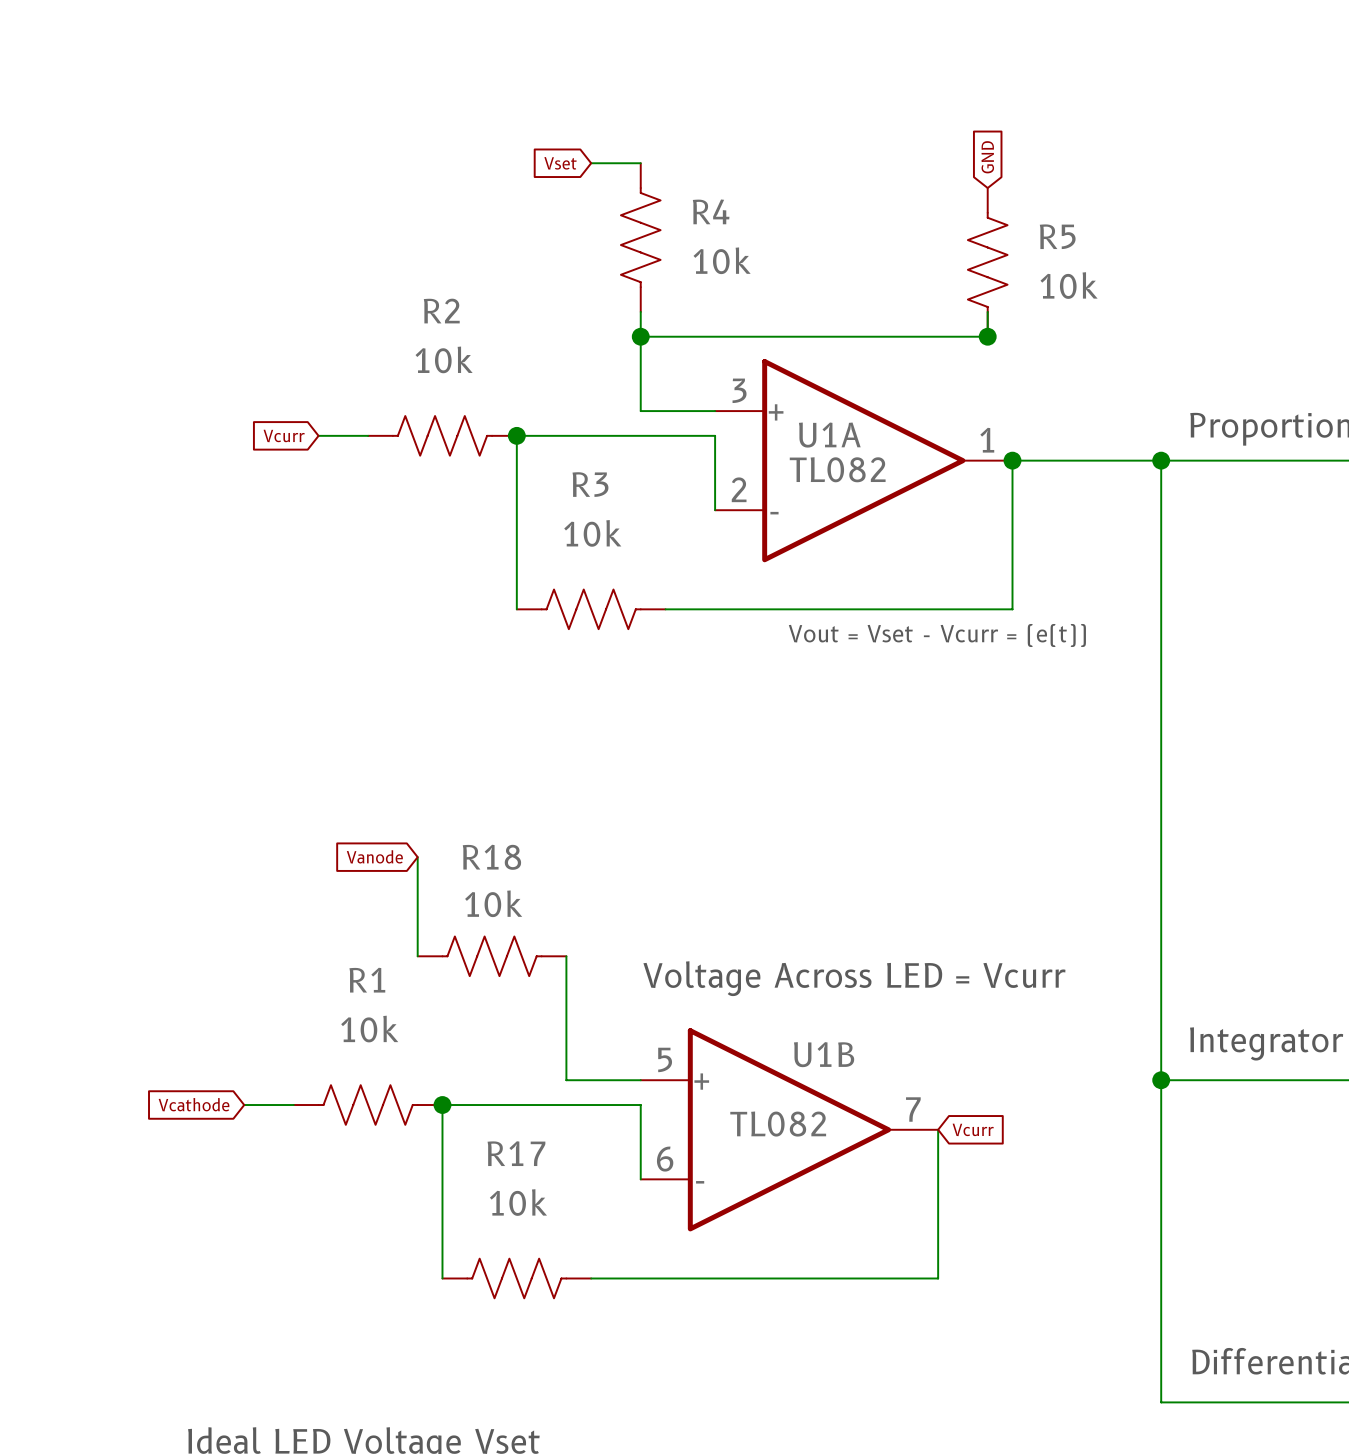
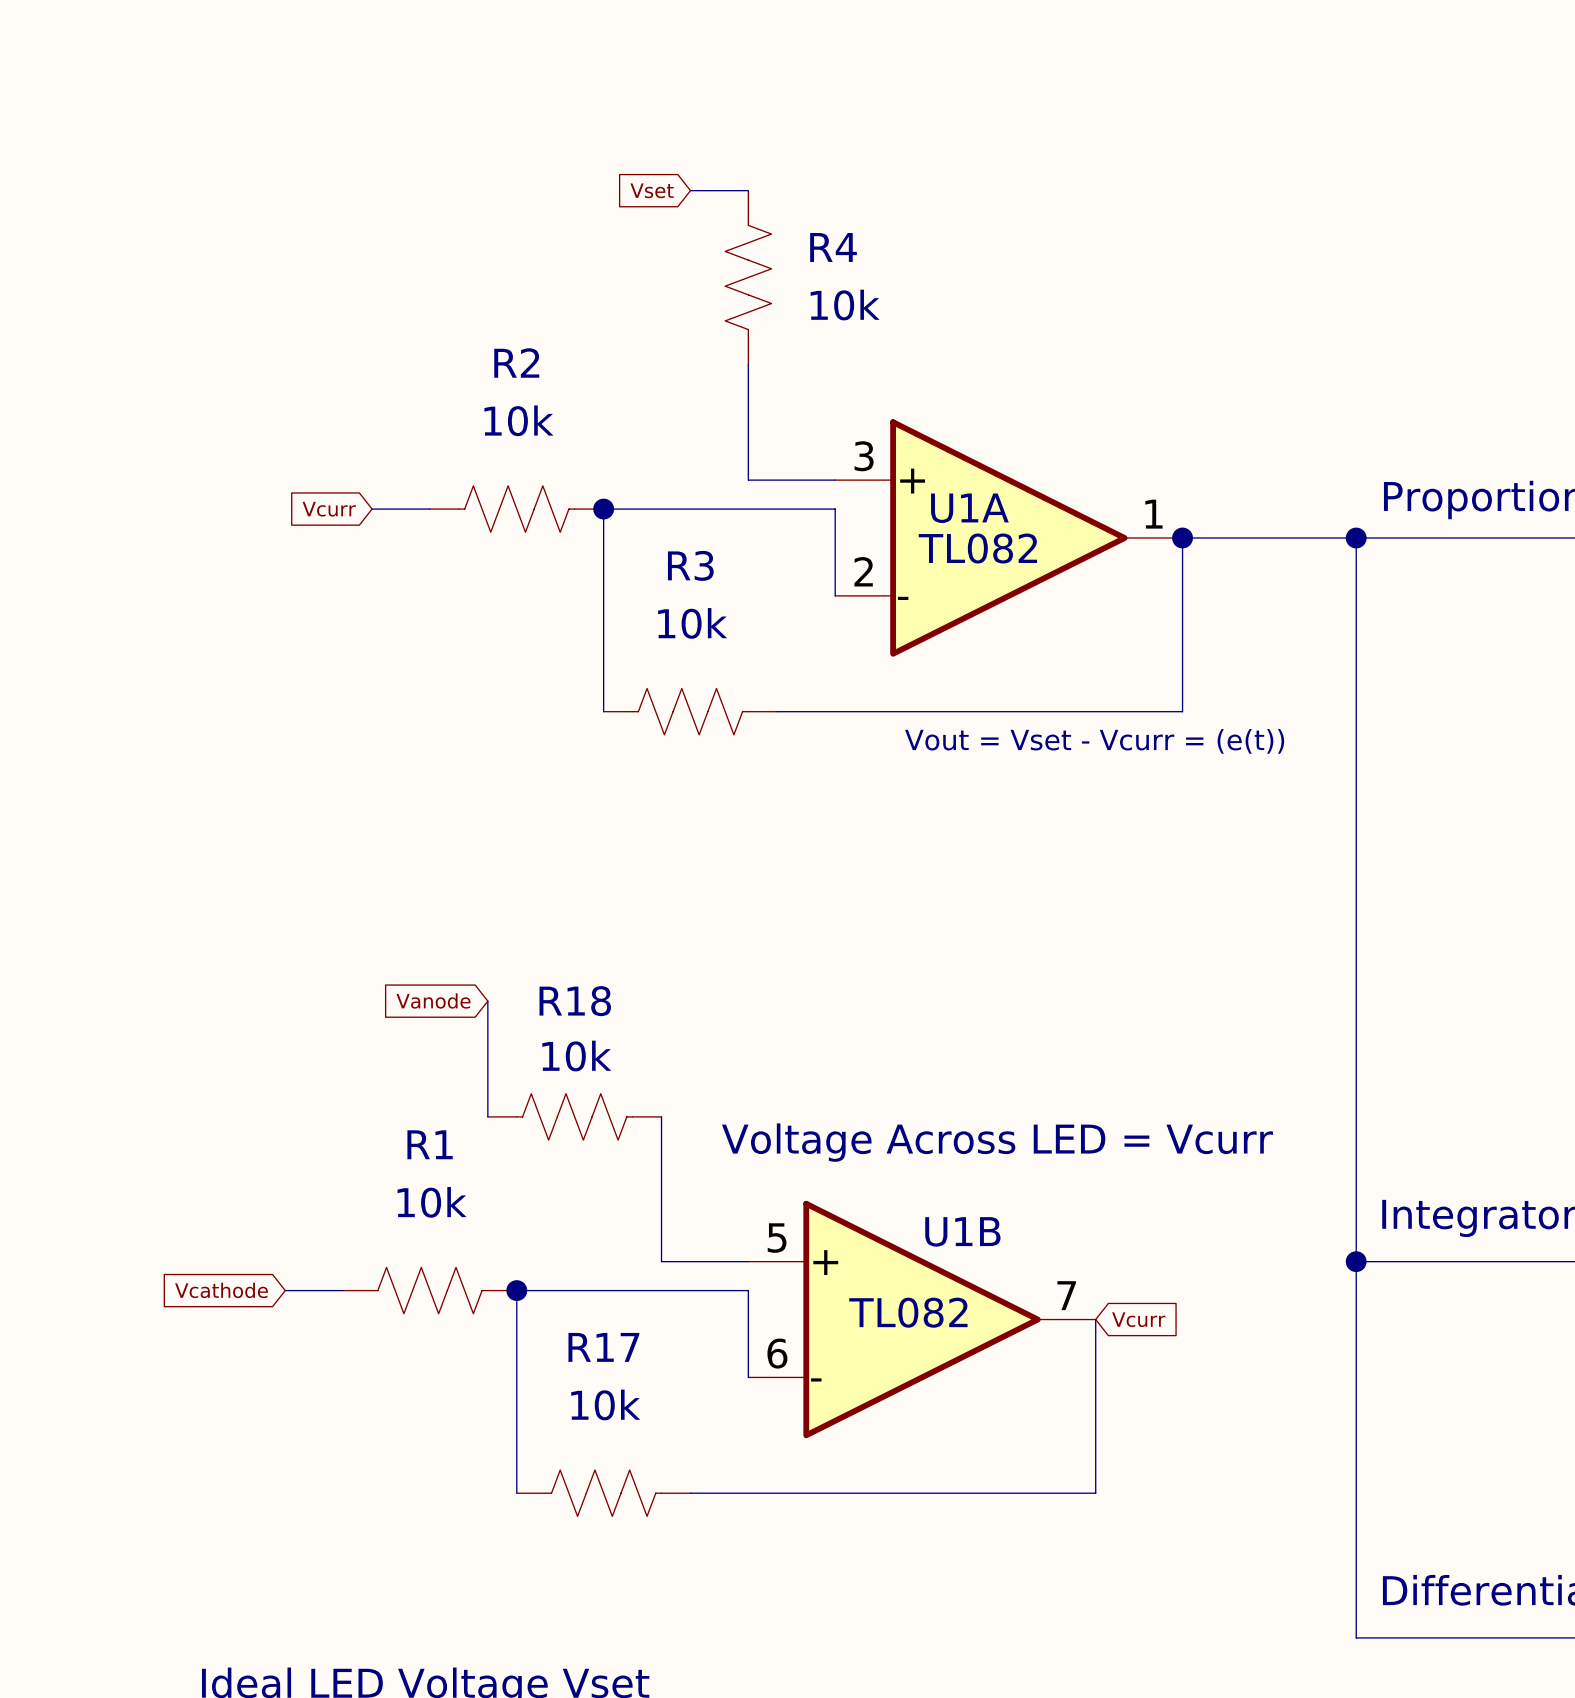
global label: GND (987, 157) -> none
R5: 10k (987, 262) -> none
wire: (987, 311) (987, 336) (640, 336) -> none
junction: (640, 336) -> none
junction: (987, 336) -> none

